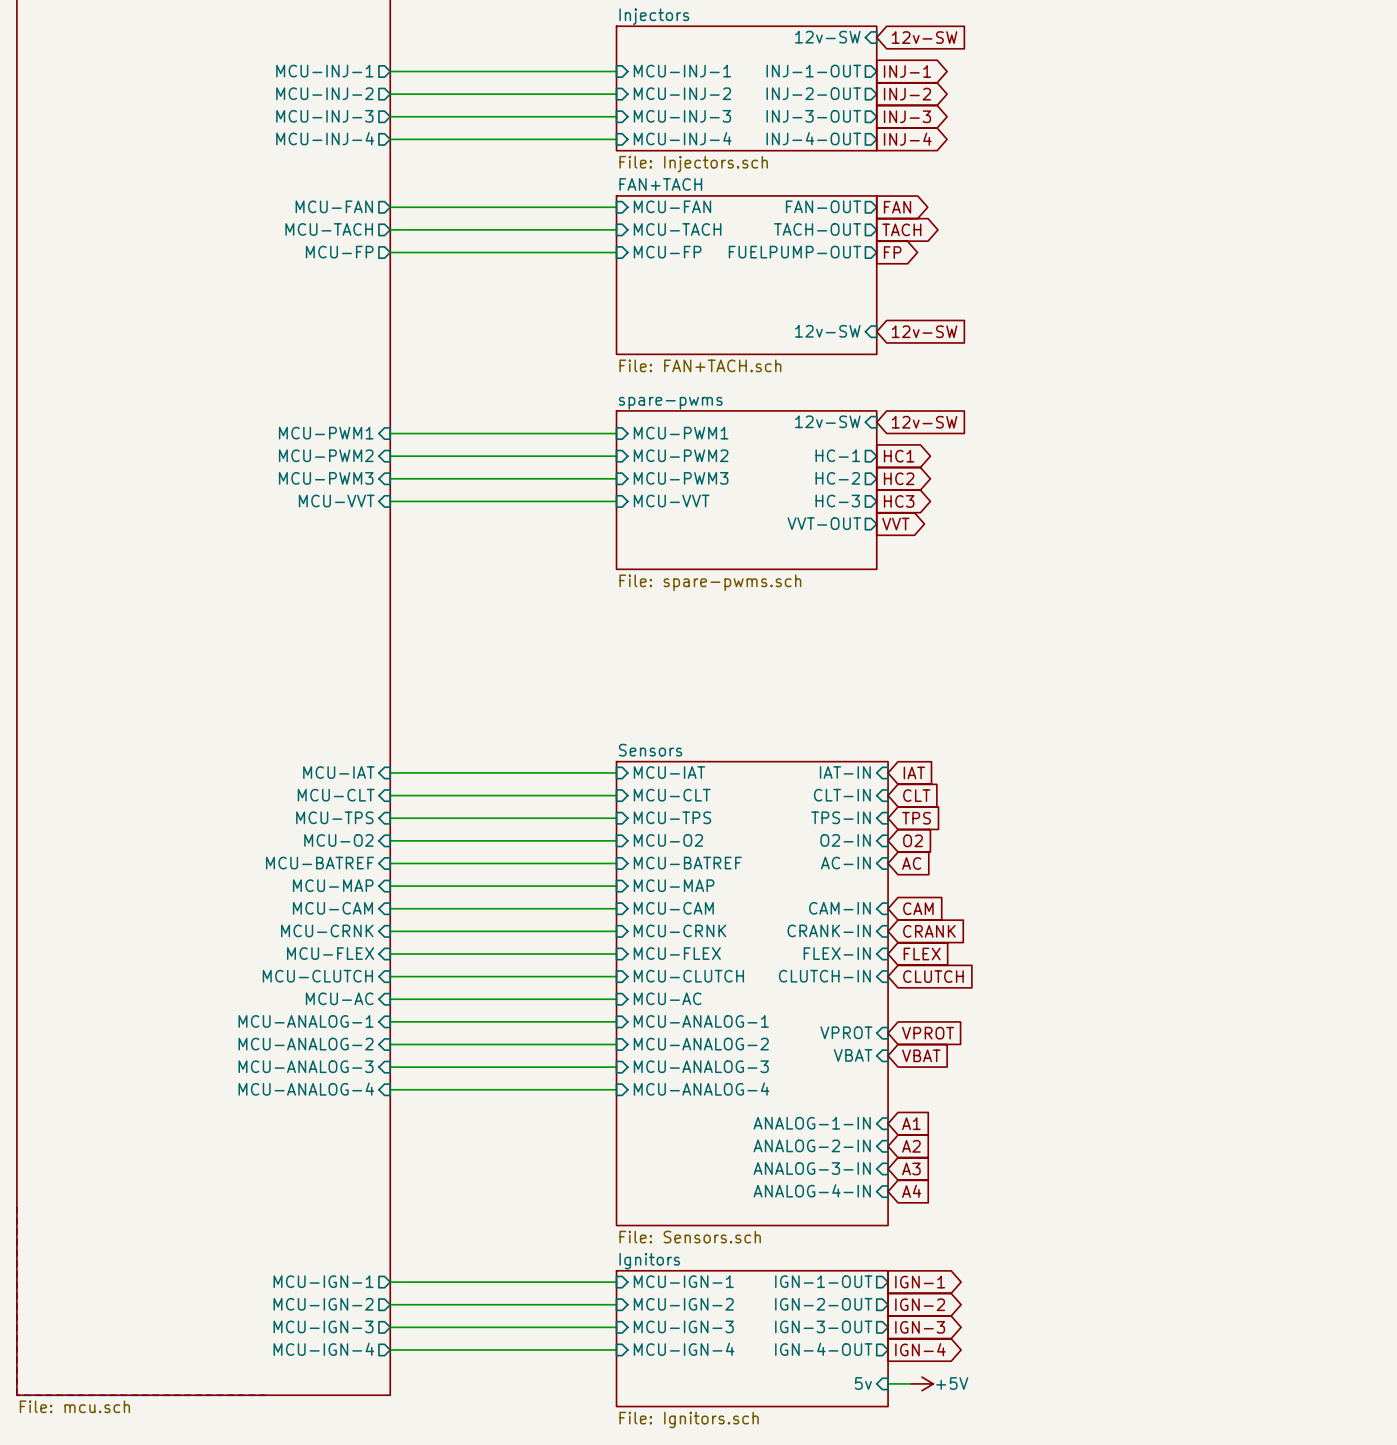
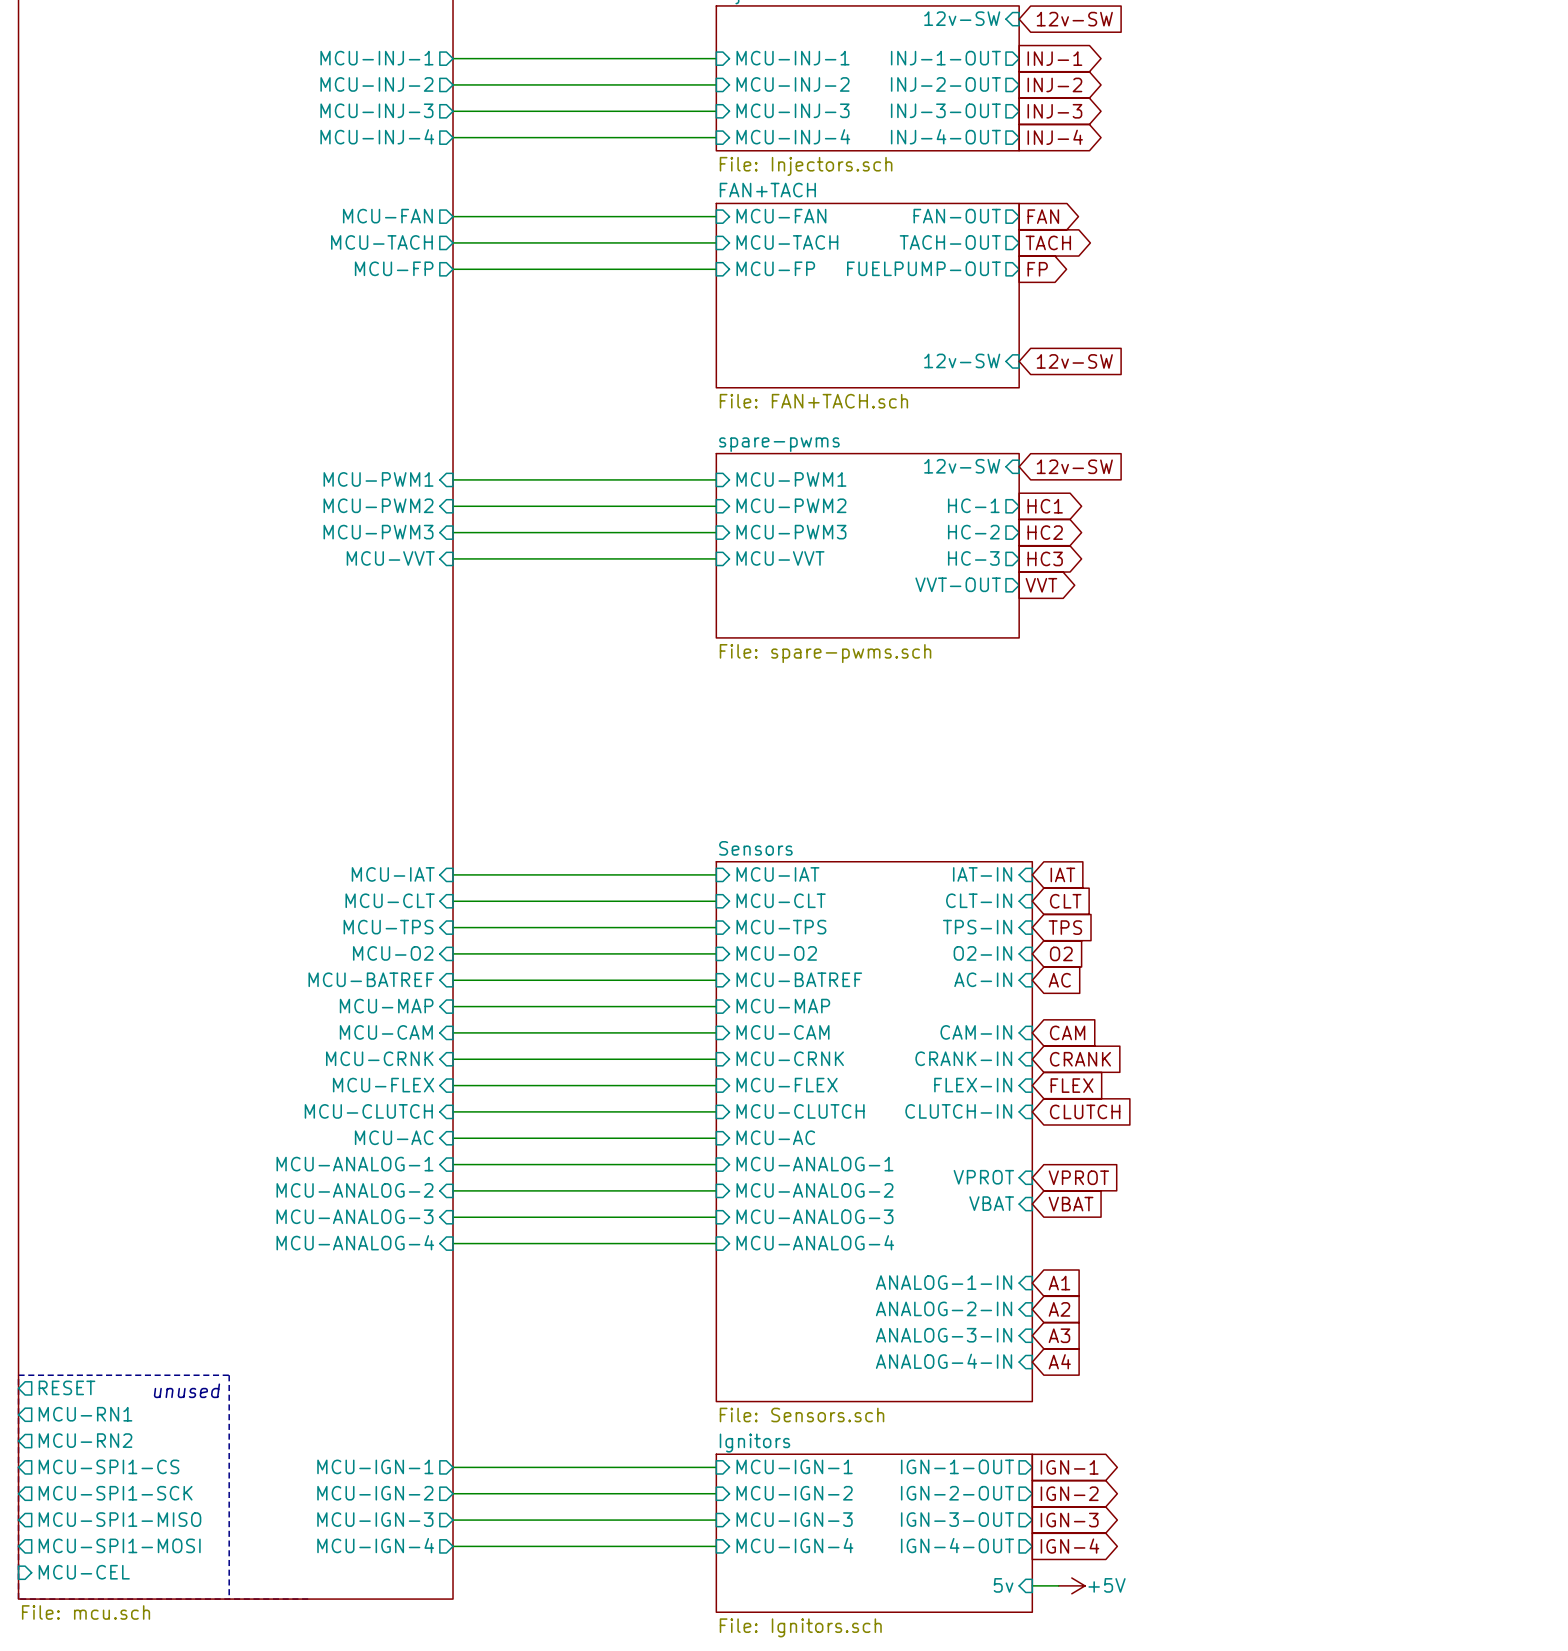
line: none -> (18, 1375) (229, 1375) (229, 1599)
sheet pin: none -> RESET (67, 1387)
text: none -> unused (186, 1390)
sheet pin: none -> MCU-RN1 (85, 1414)
sheet pin: none -> MCU-RN2 (85, 1440)
sheet pin: none -> MCU-SPI1-CS (109, 1466)
sheet pin: none -> MCU-SPI1-SCK (115, 1493)
sheet pin: none -> MCU-SPI1-MISO (119, 1519)
sheet pin: none -> MCU-SPI1-MOSI (119, 1545)
sheet pin: none -> MCU-CEL (84, 1572)

